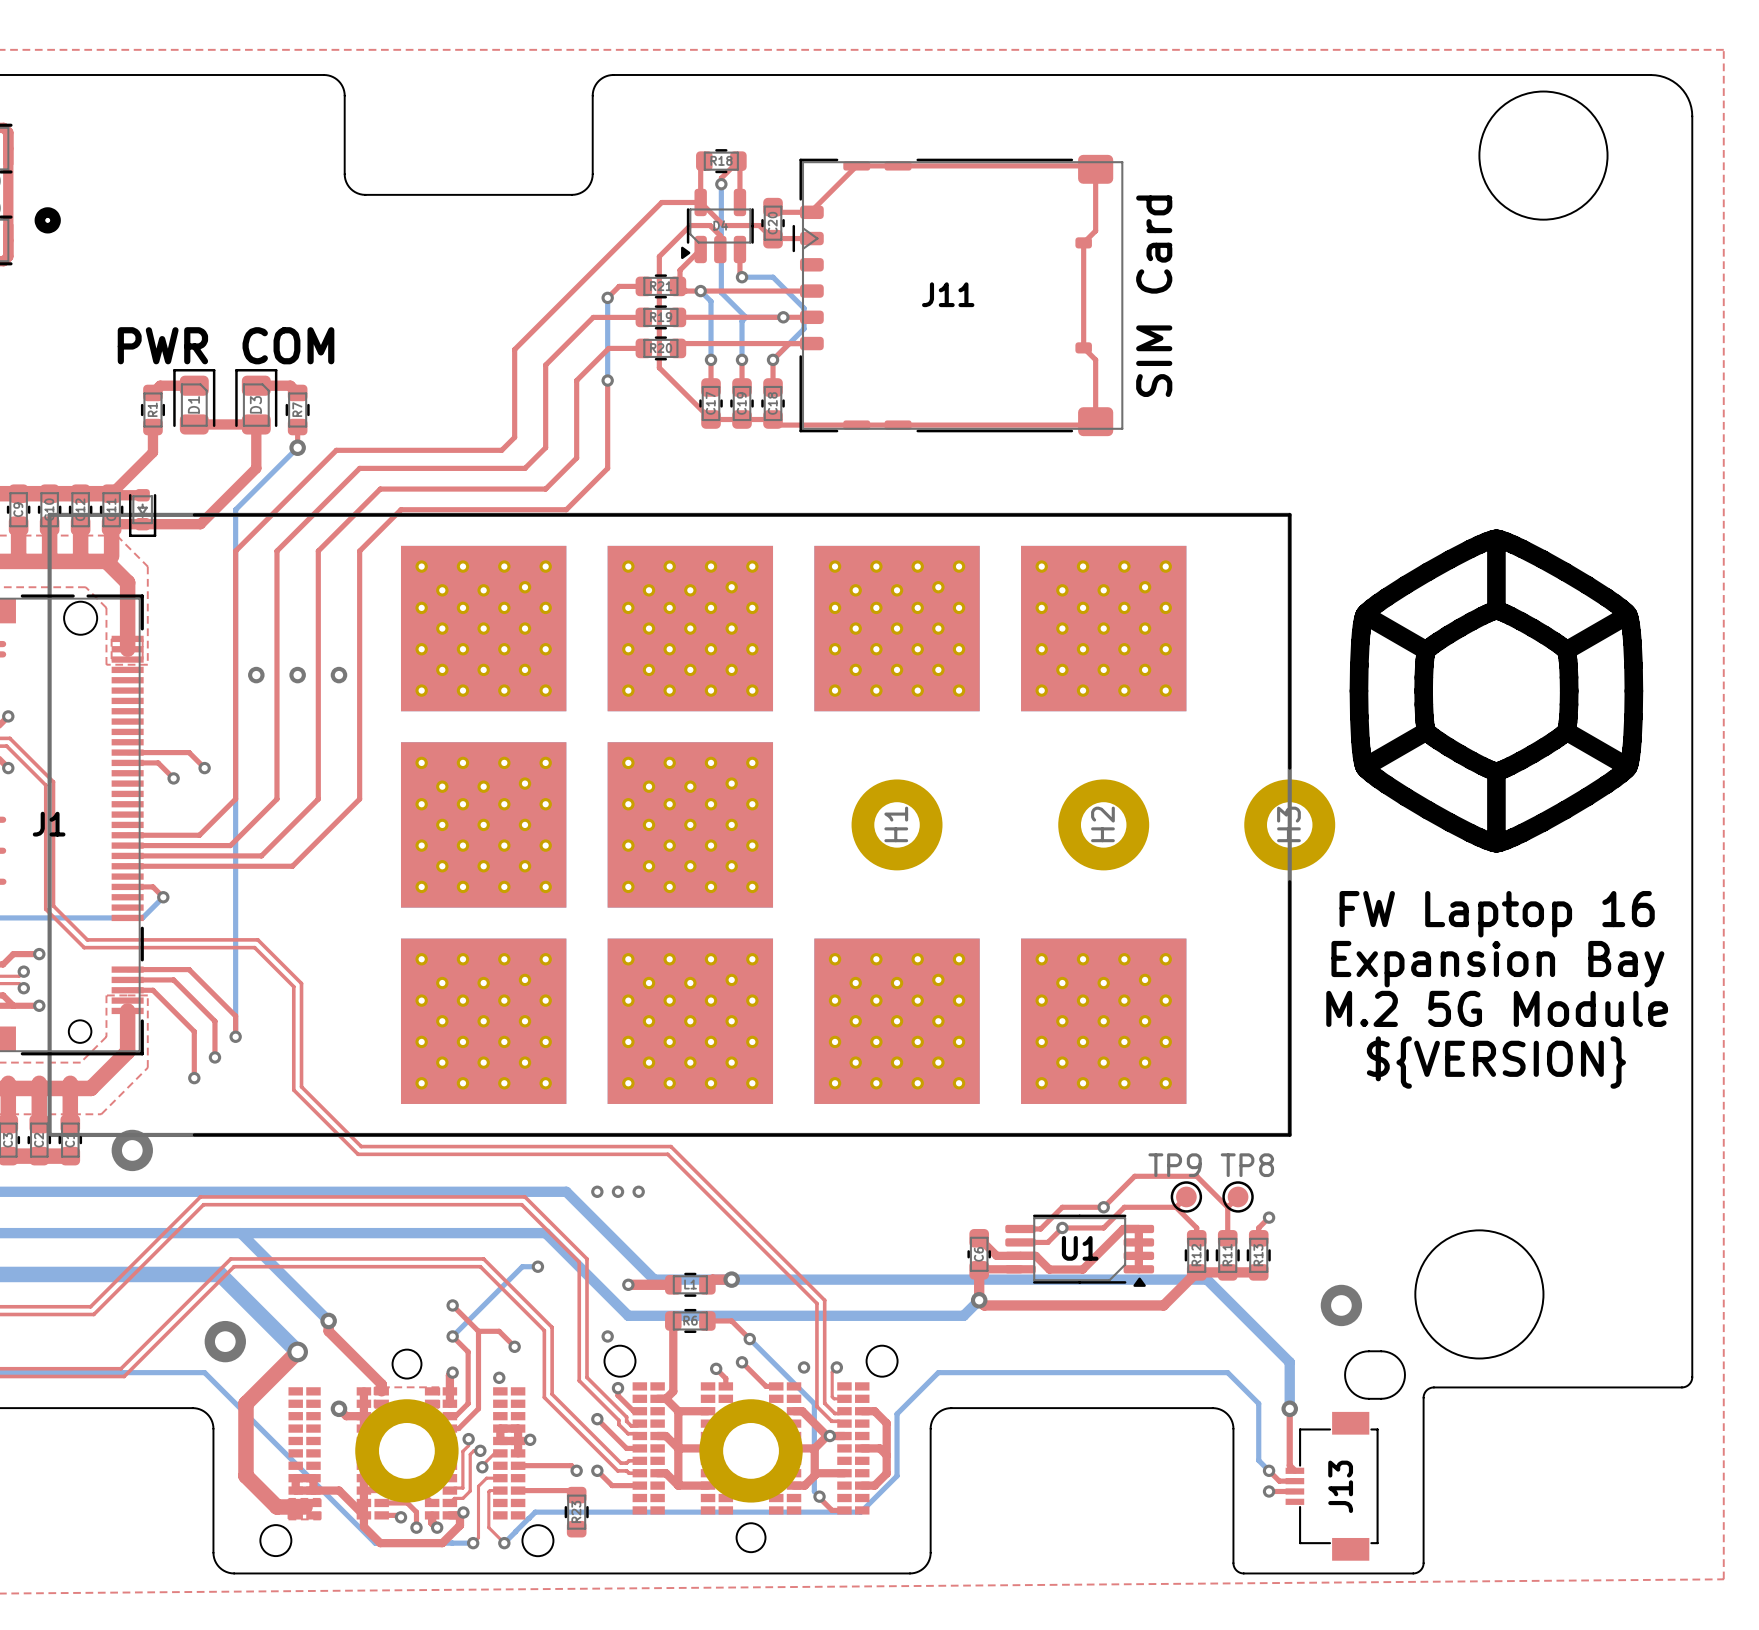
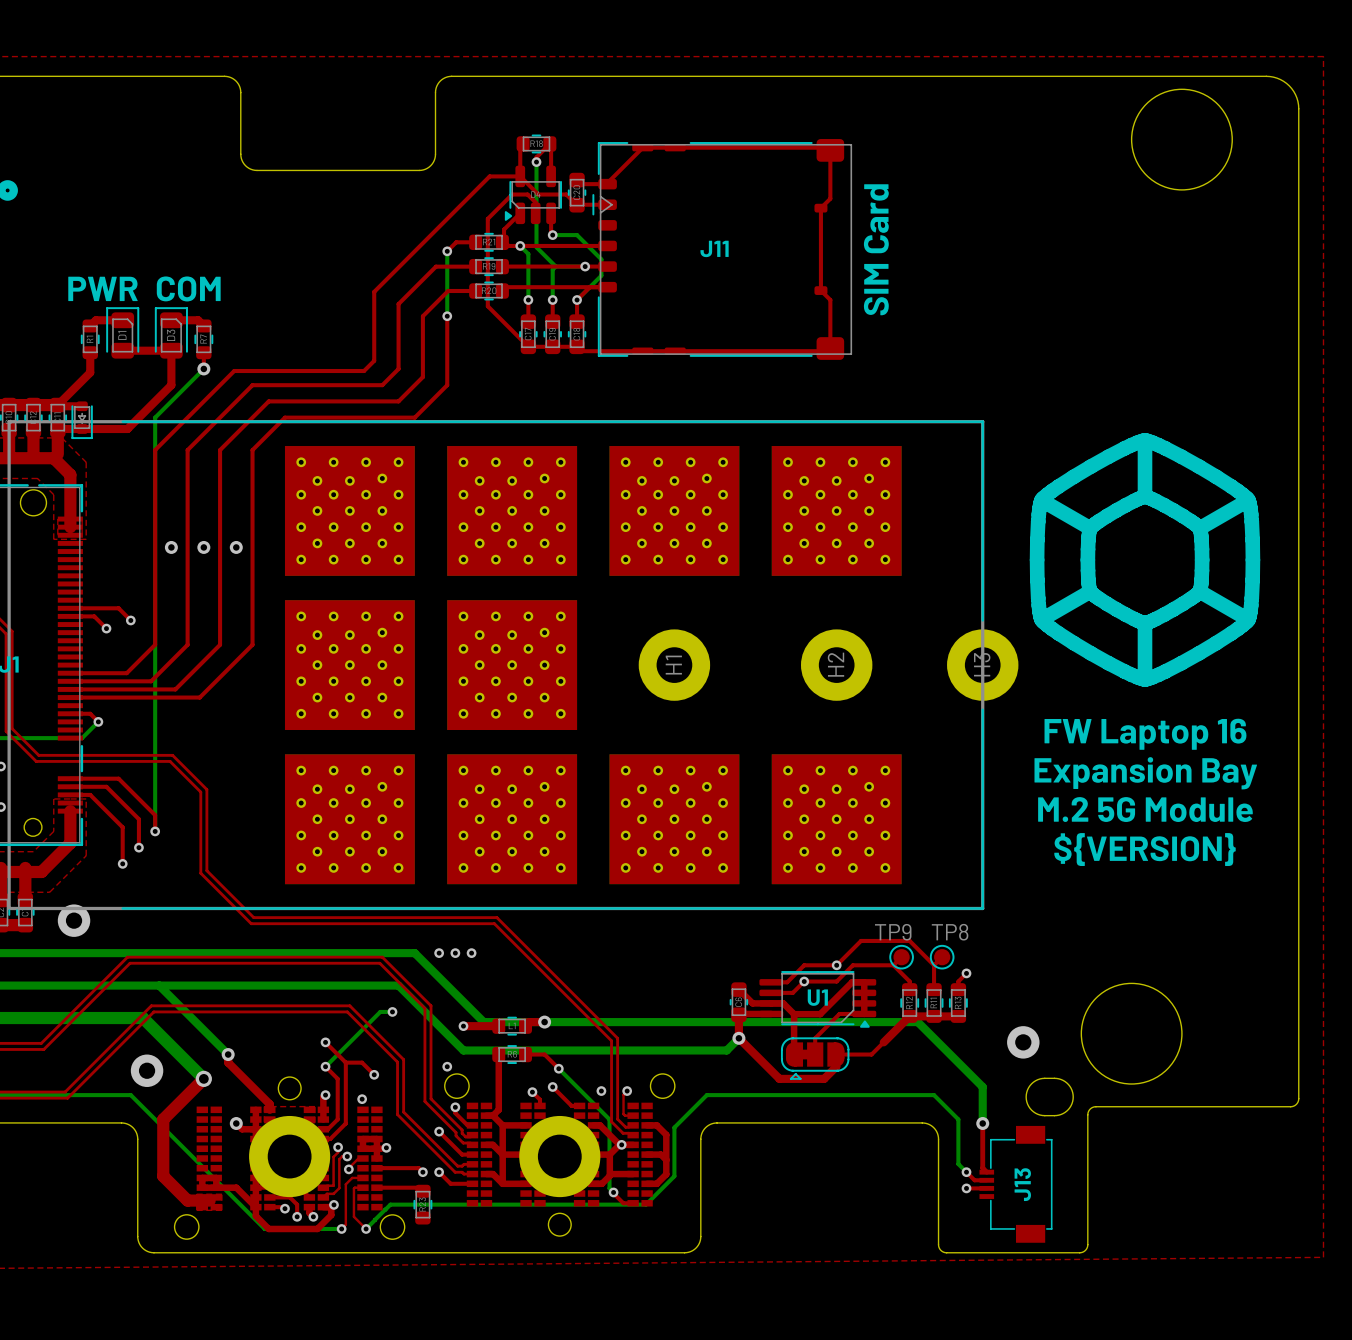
top track: none -> (794, 1014) (794, 1054)
top track: none -> (864, 1013) (839, 1013) (815, 1038) (815, 1054)
top track: (984, 1305) (1163, 1305) -> (742, 1042) (779, 1078) (824, 1078) (836, 1066) (836, 1054) (871, 1054) (883, 1042)
part: none -> (815, 1058)

